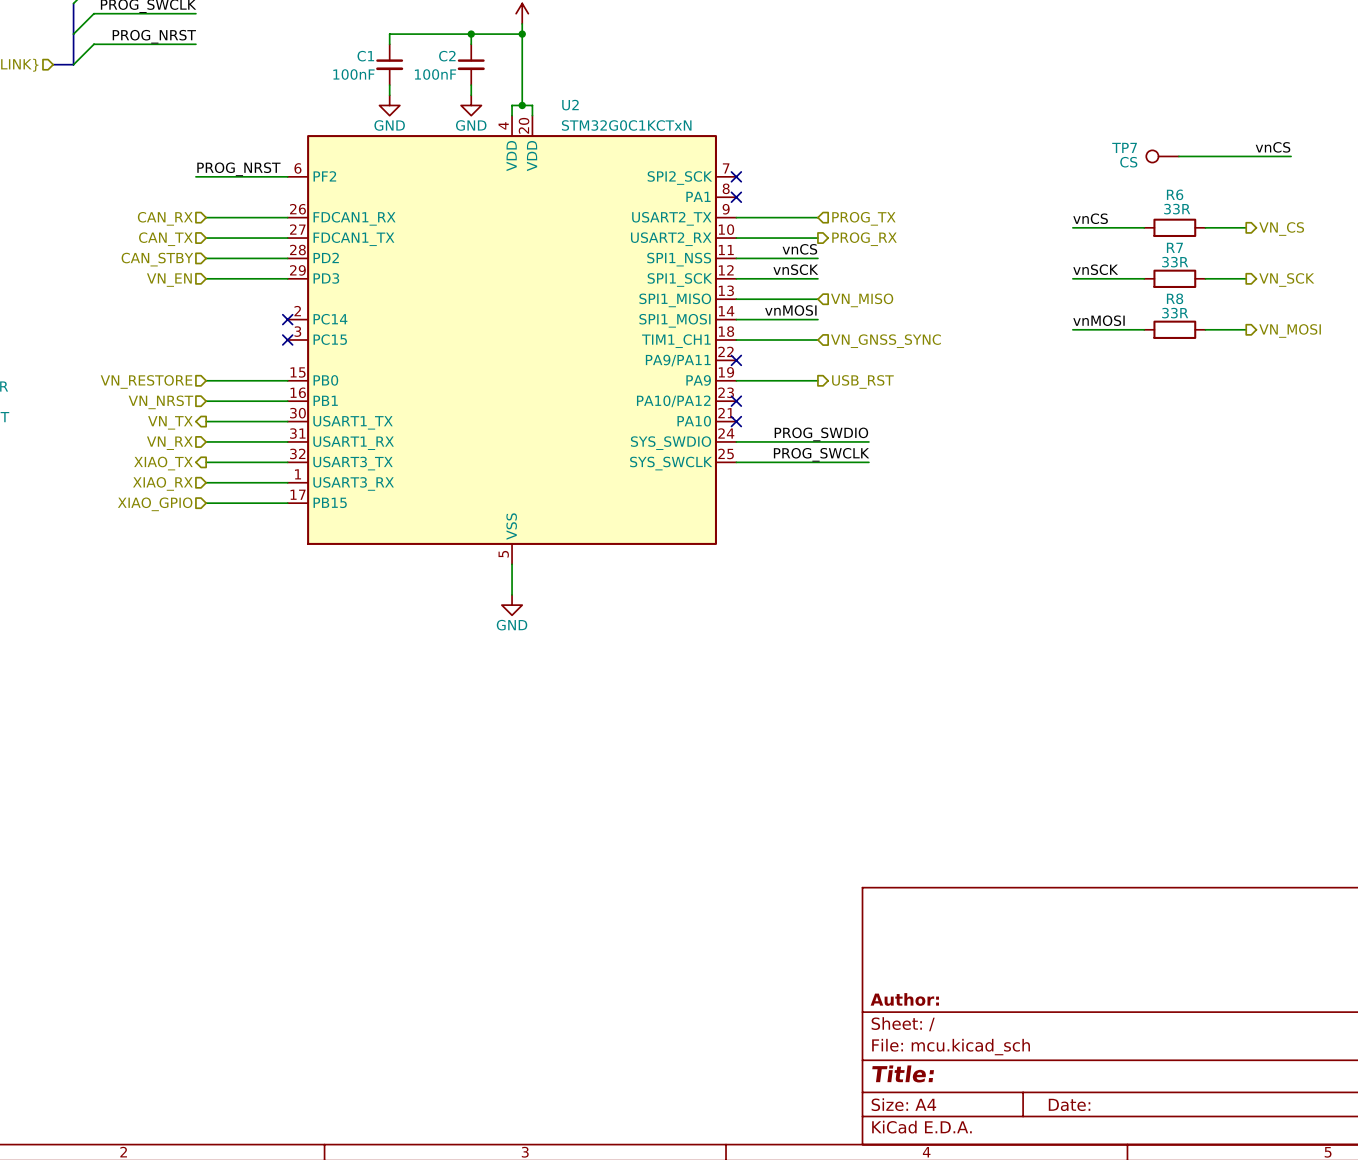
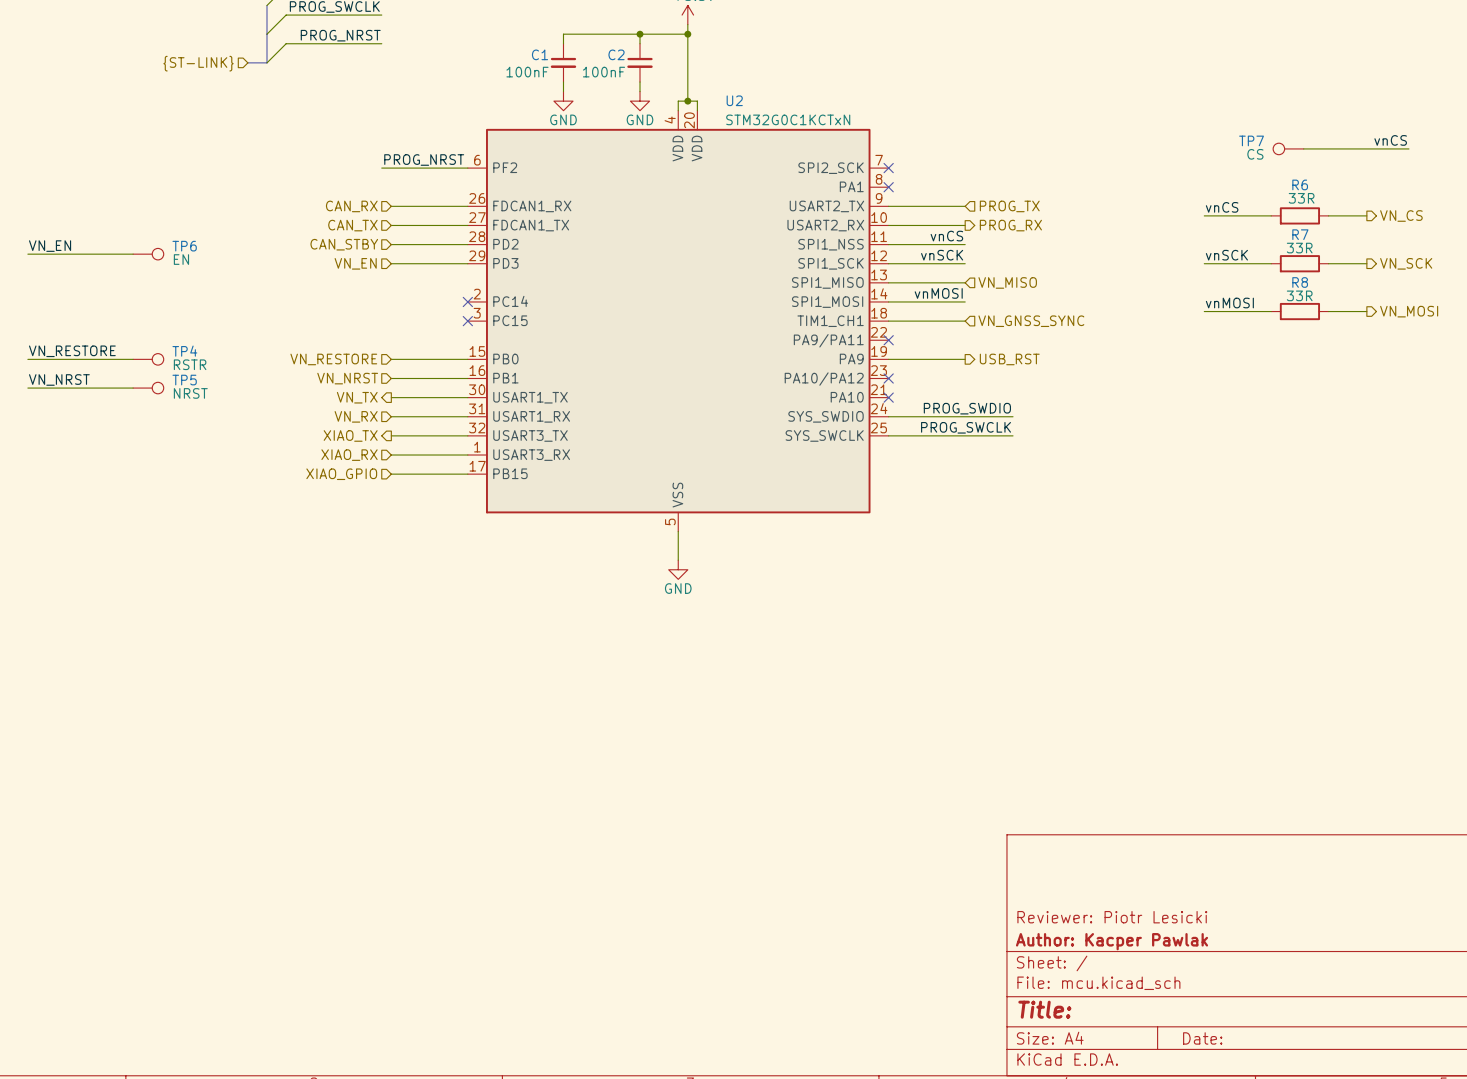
title block: none -> Reviewer: Piotr Lesicki (1112, 917)
title block: Author: (904, 999) -> Author: Kacper Pawlak (1112, 941)

